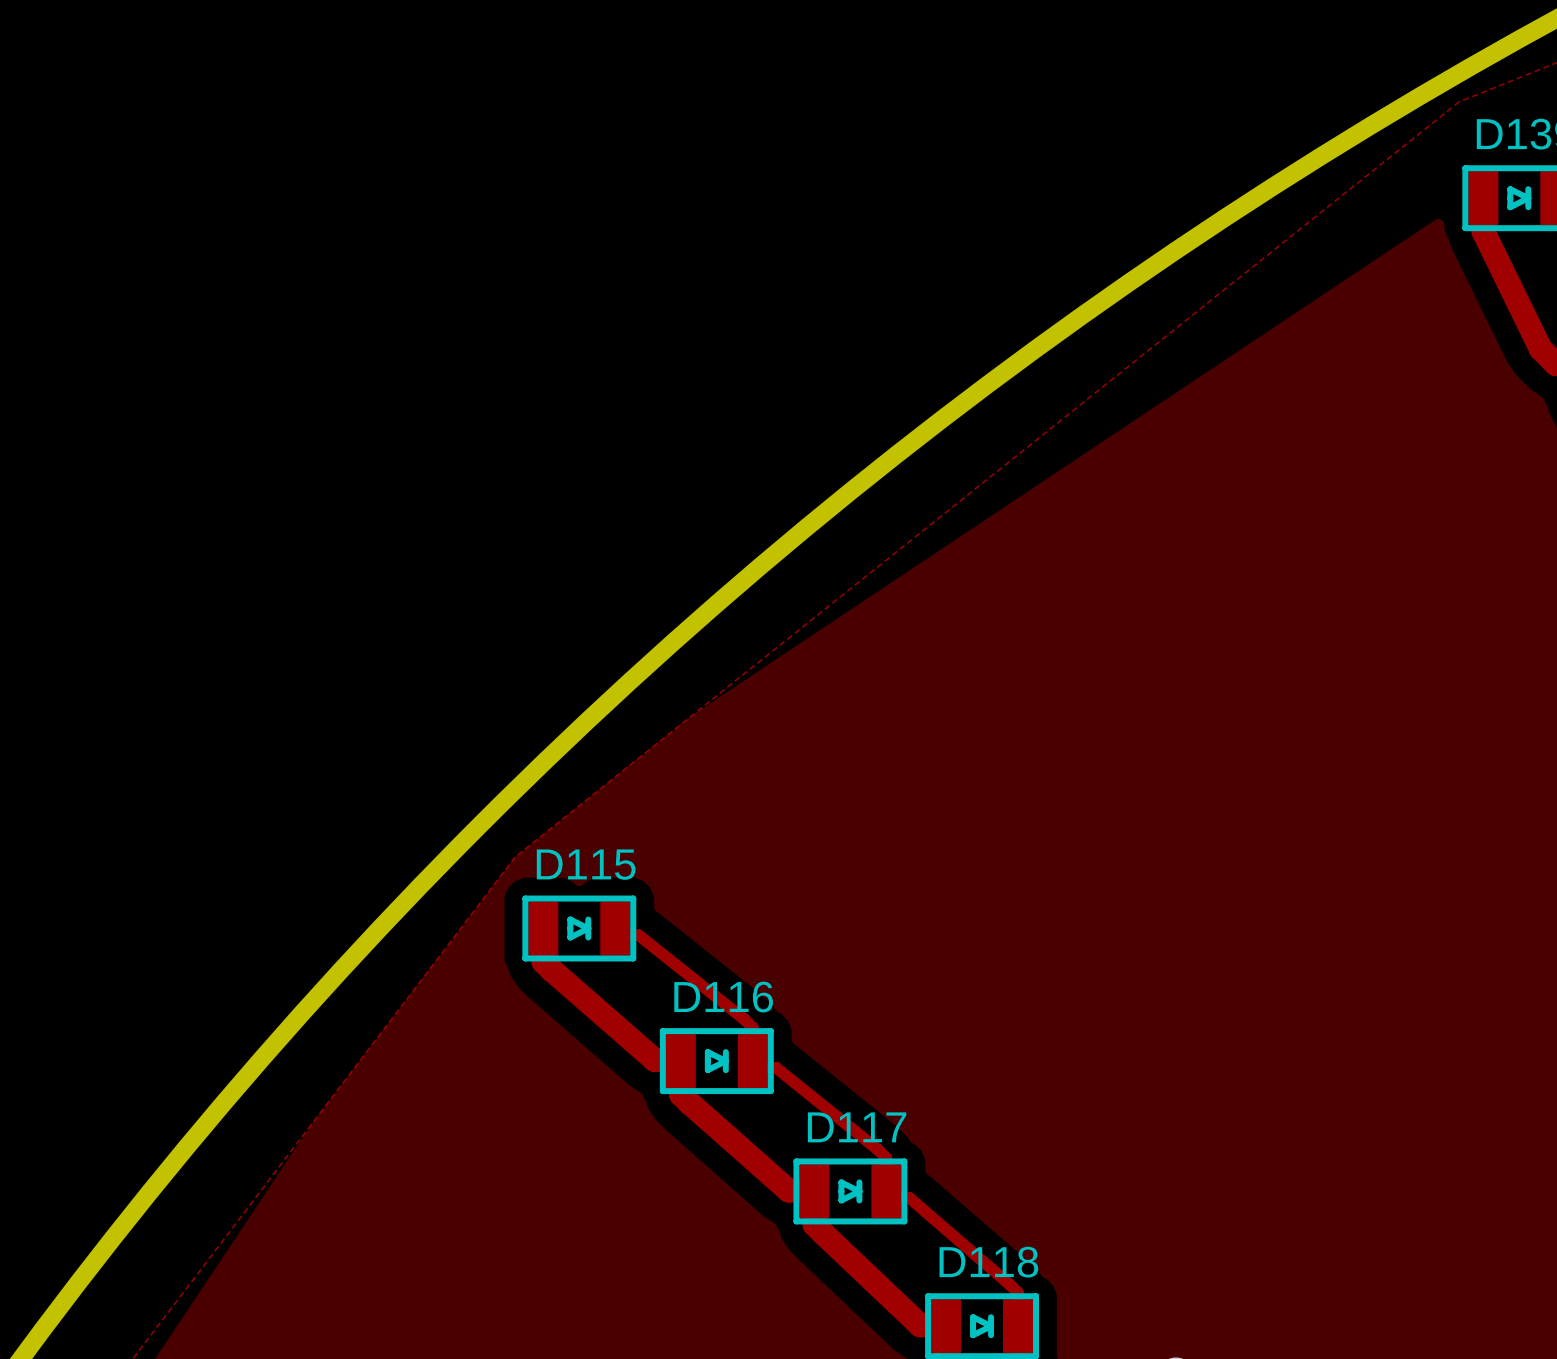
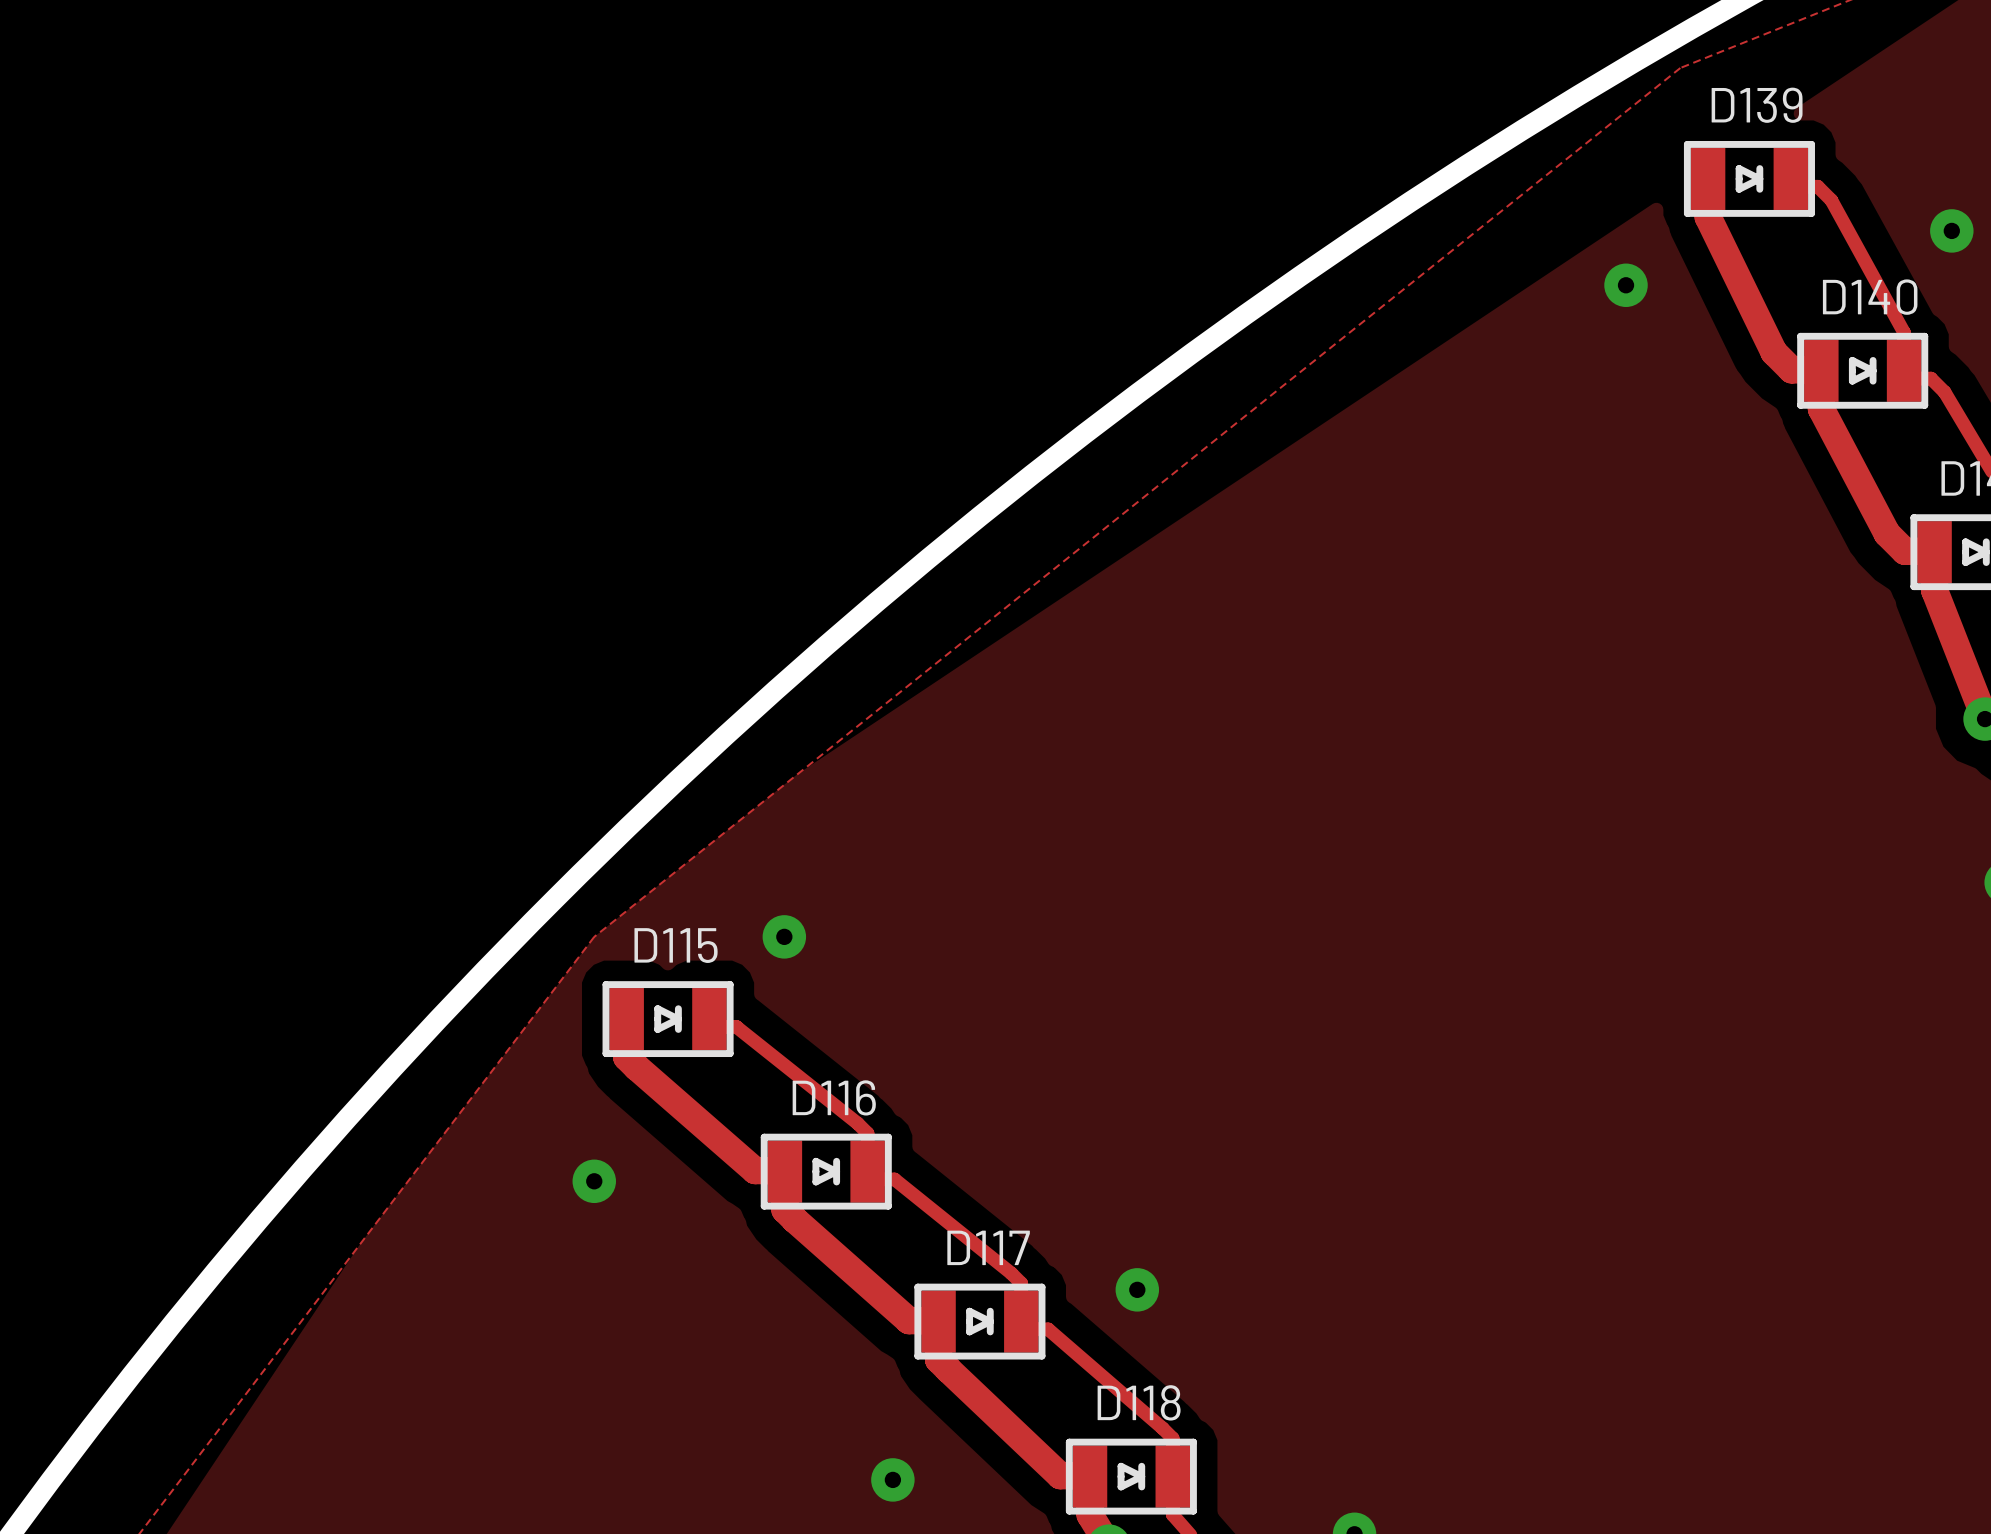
via: none -> (1626, 285)
via: none -> (784, 936)
via: none -> (594, 1181)
via: none -> (1137, 1289)
via: none -> (892, 1479)

